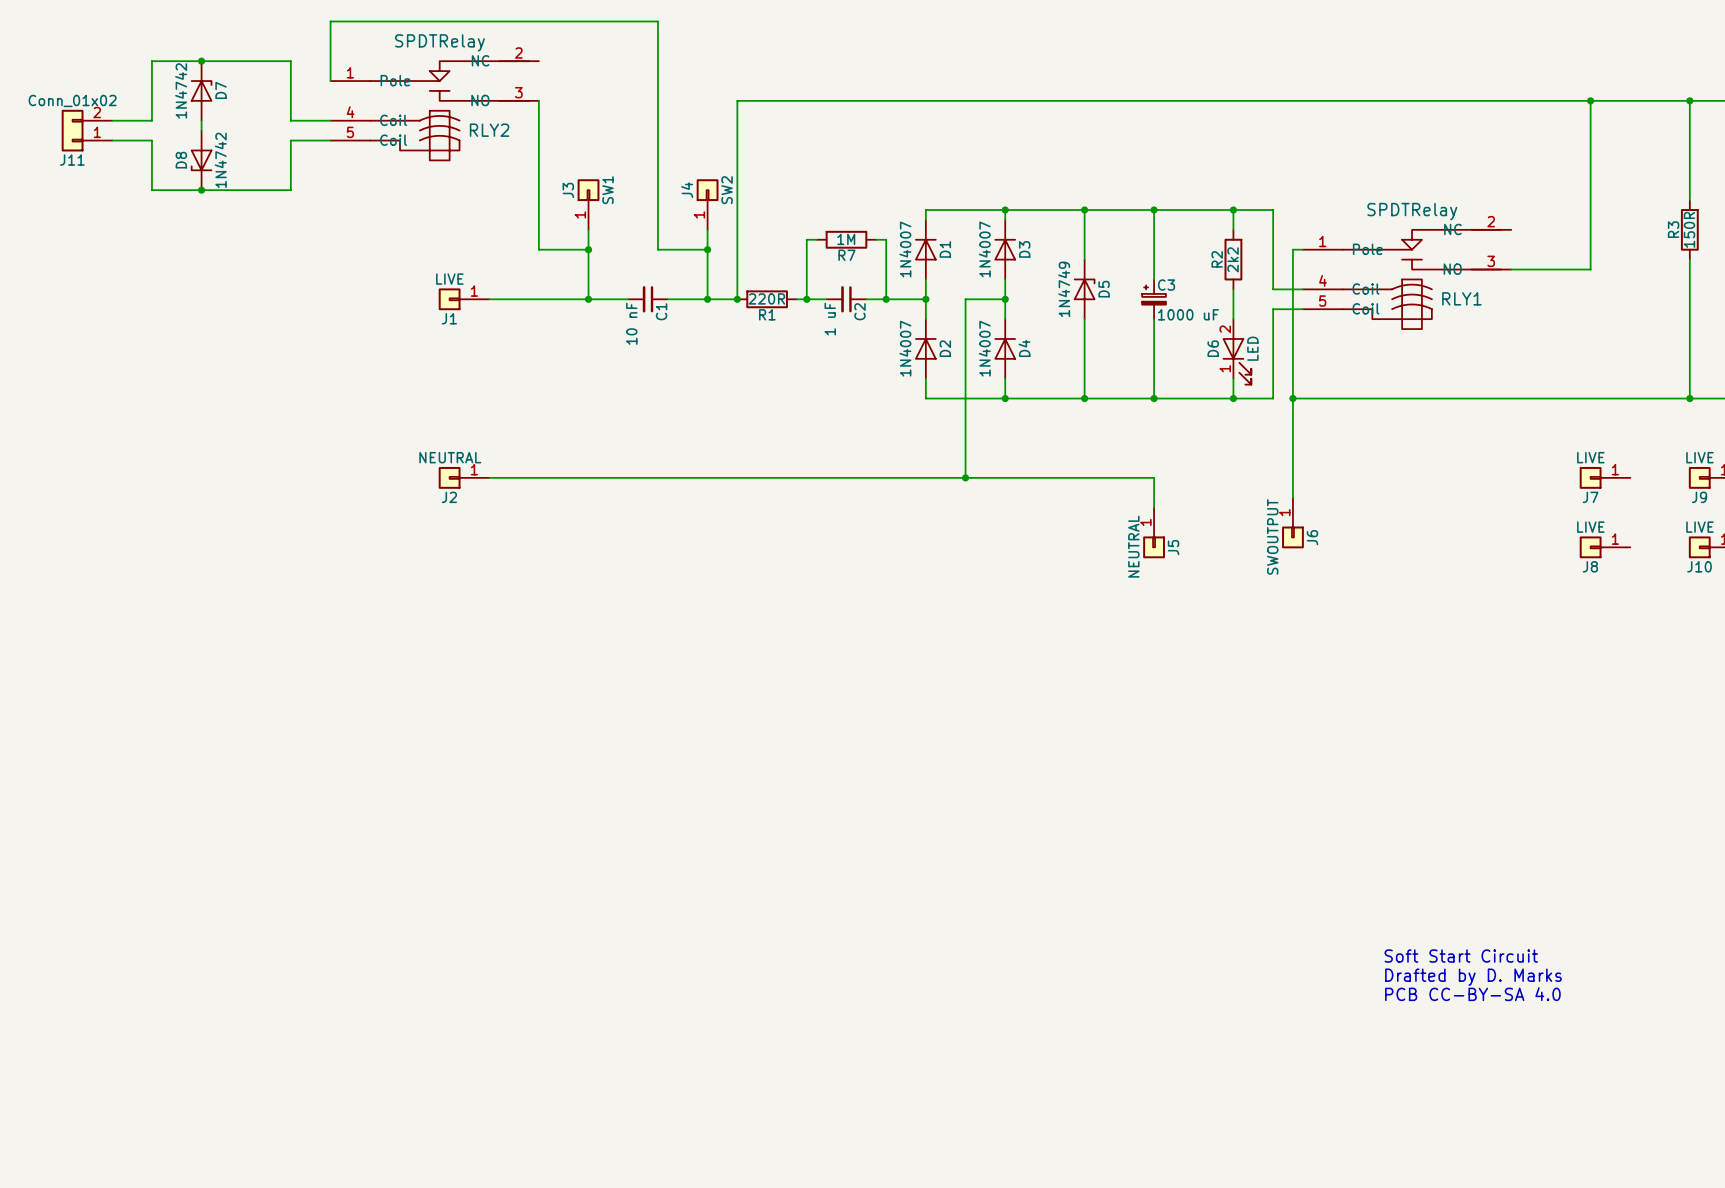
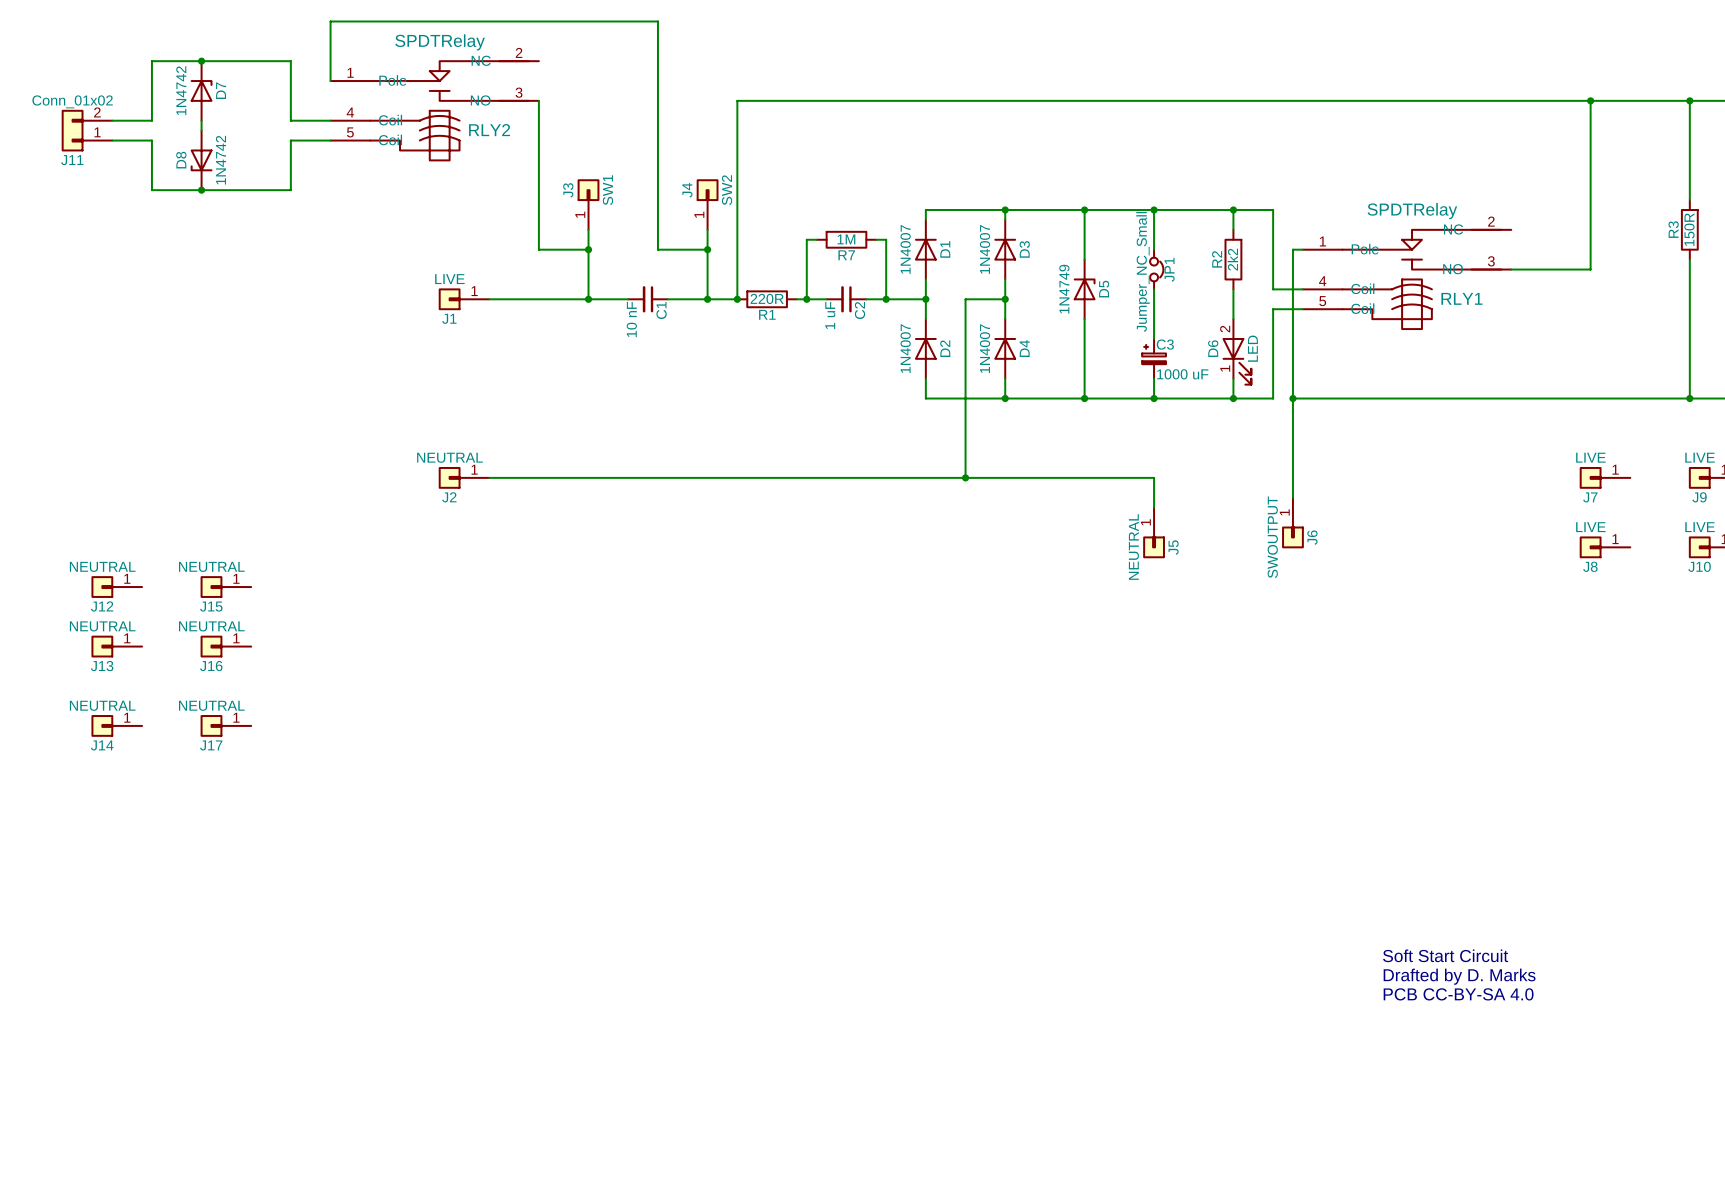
JP1: none -> Jumper_NC_Small (1156, 269)
C3 position: (1154, 299) -> (1154, 358)
J12: none -> NEUTRAL (116, 587)
J15: none -> NEUTRAL (225, 587)
J13: none -> NEUTRAL (116, 646)
J16: none -> NEUTRAL (225, 646)
J14: none -> NEUTRAL (116, 725)
J17: none -> NEUTRAL (225, 725)

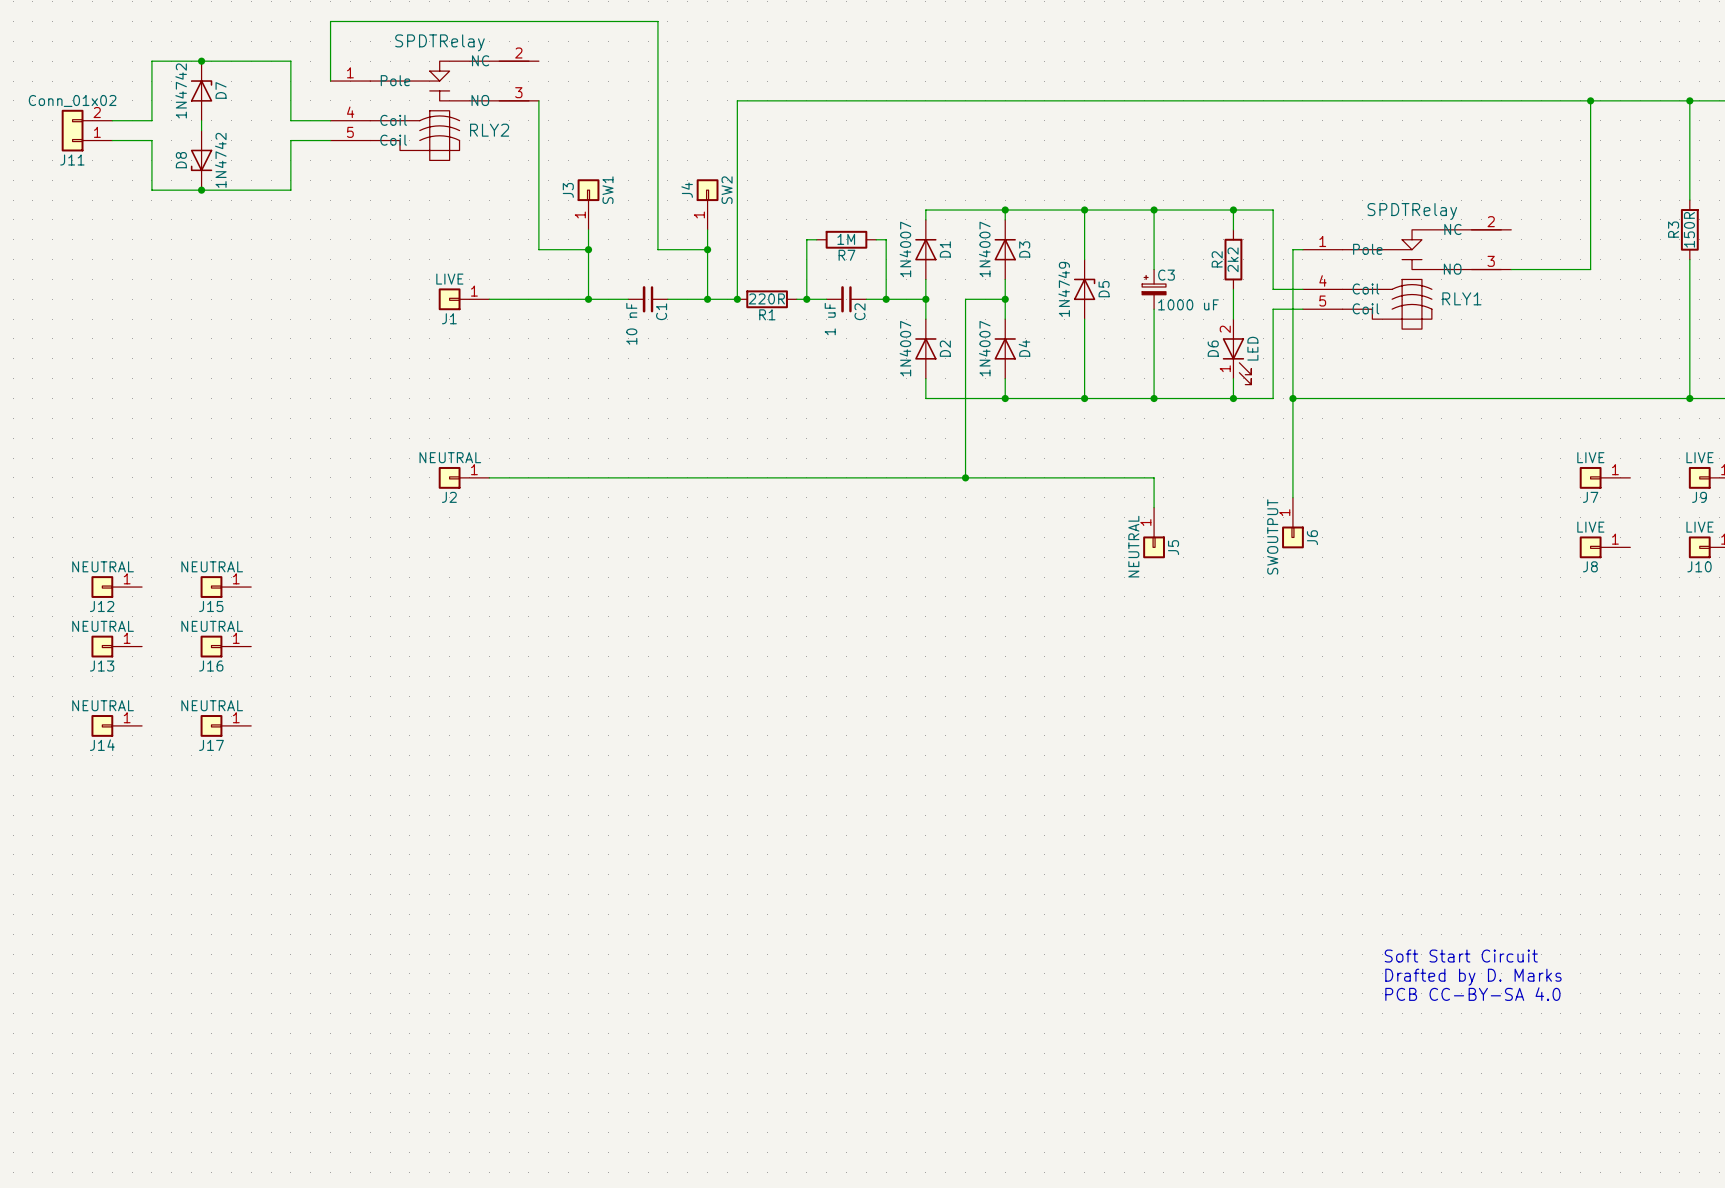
JP1: Jumper_NC_Small (1156, 269) -> none
C3 position: (1154, 358) -> (1154, 289)

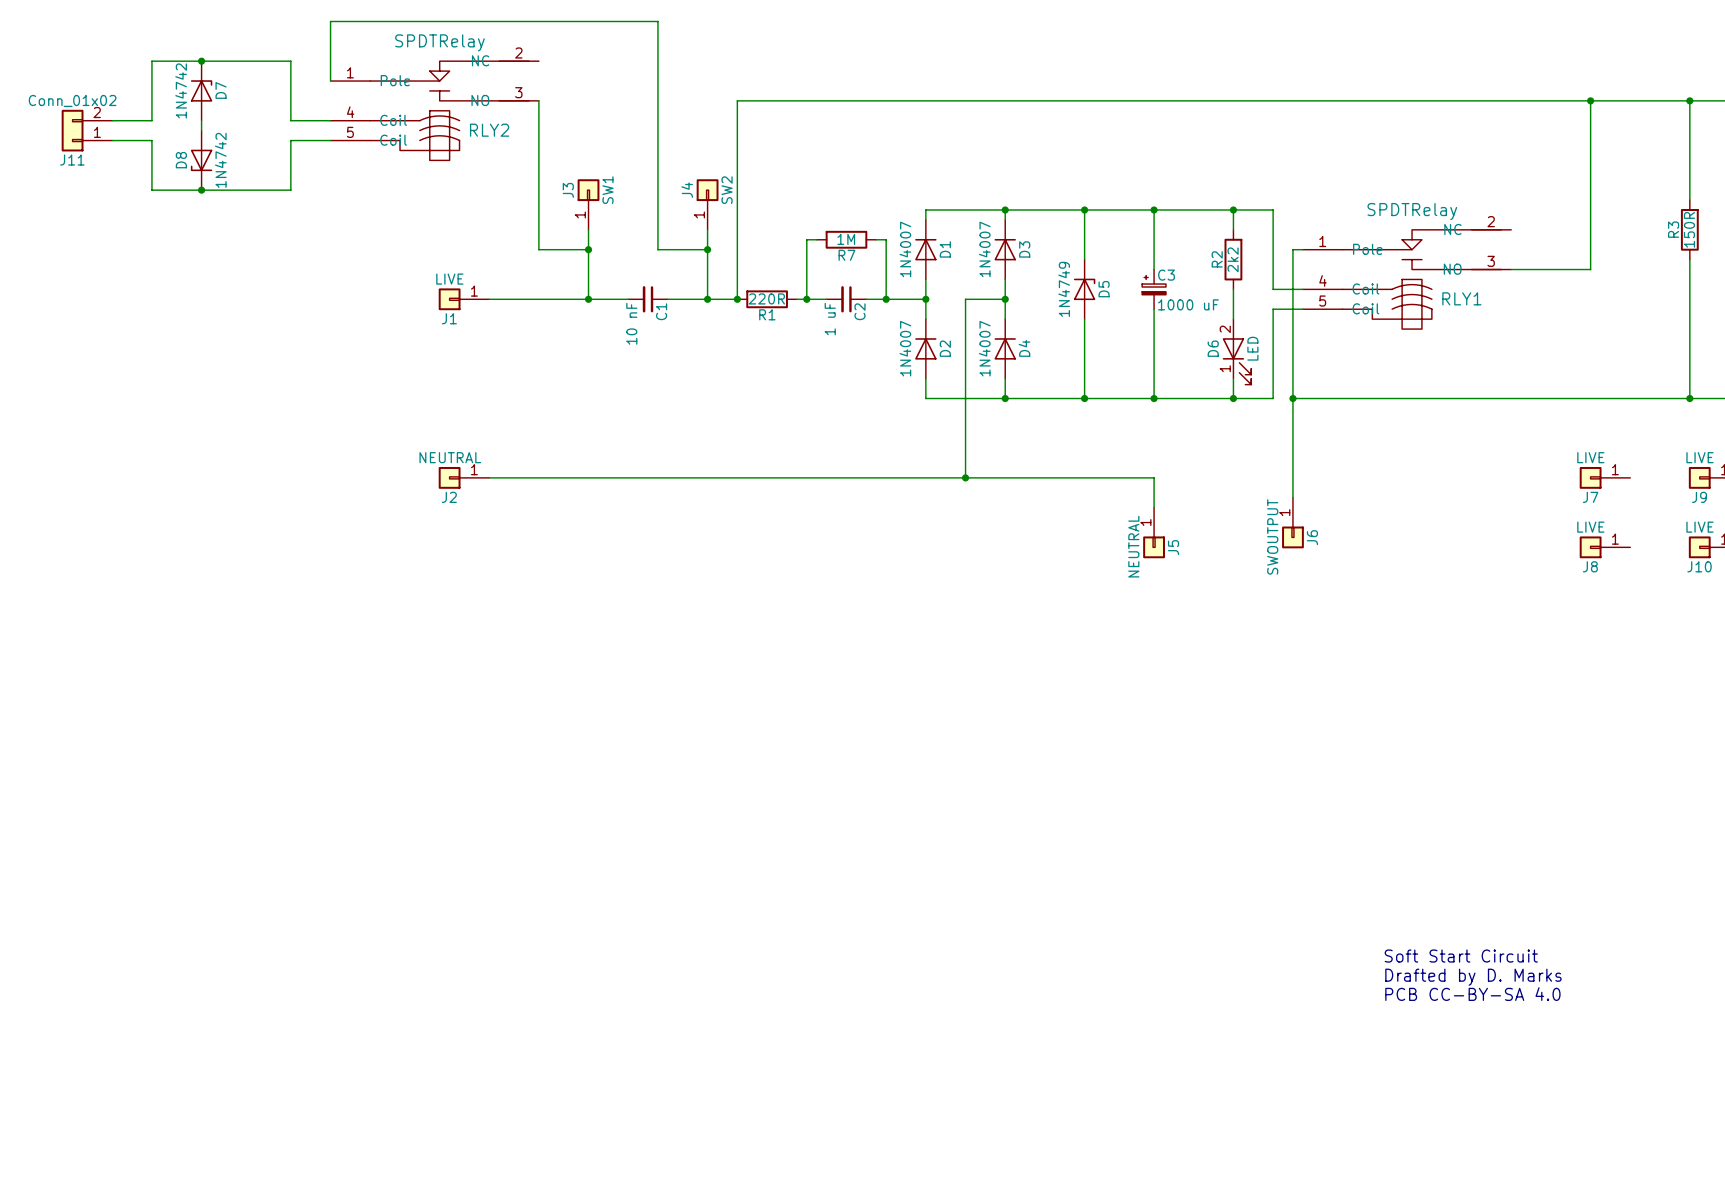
J12: NEUTRAL (116, 587) -> none
J15: NEUTRAL (225, 587) -> none
J13: NEUTRAL (116, 646) -> none
J16: NEUTRAL (225, 646) -> none
J14: NEUTRAL (116, 725) -> none
J17: NEUTRAL (225, 725) -> none

